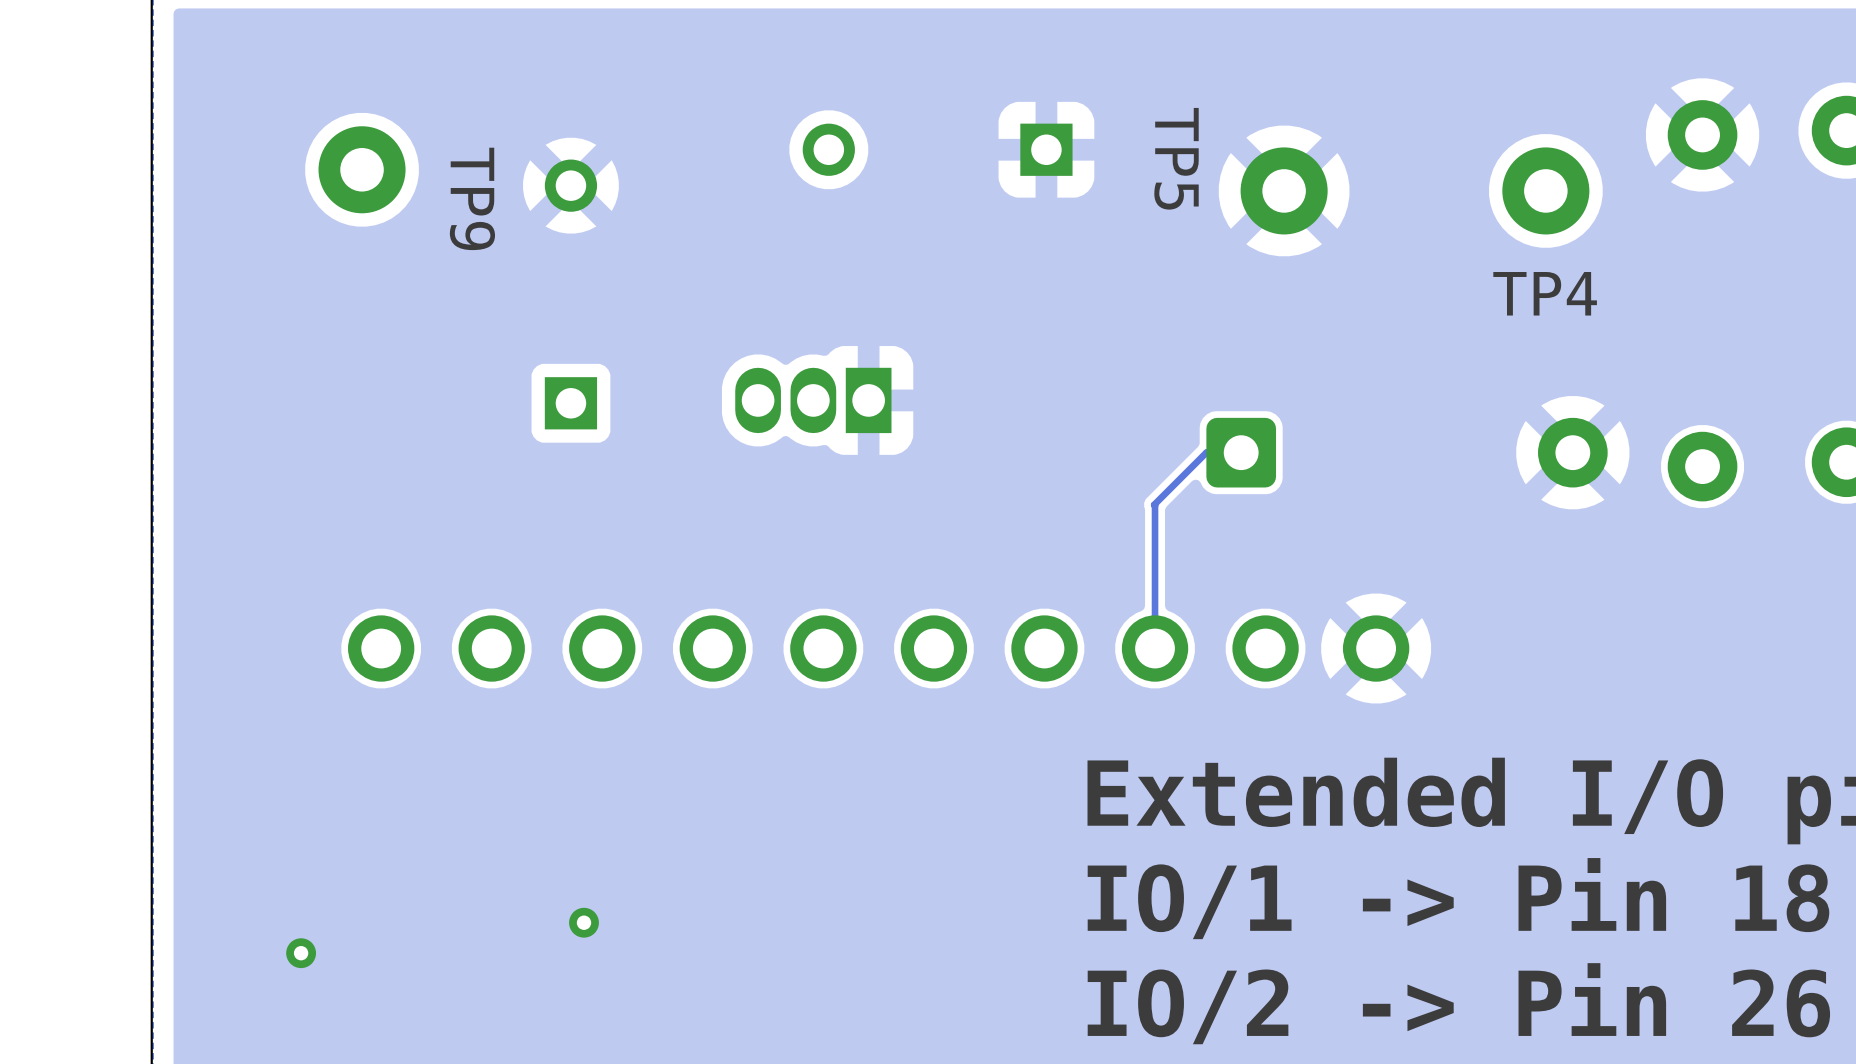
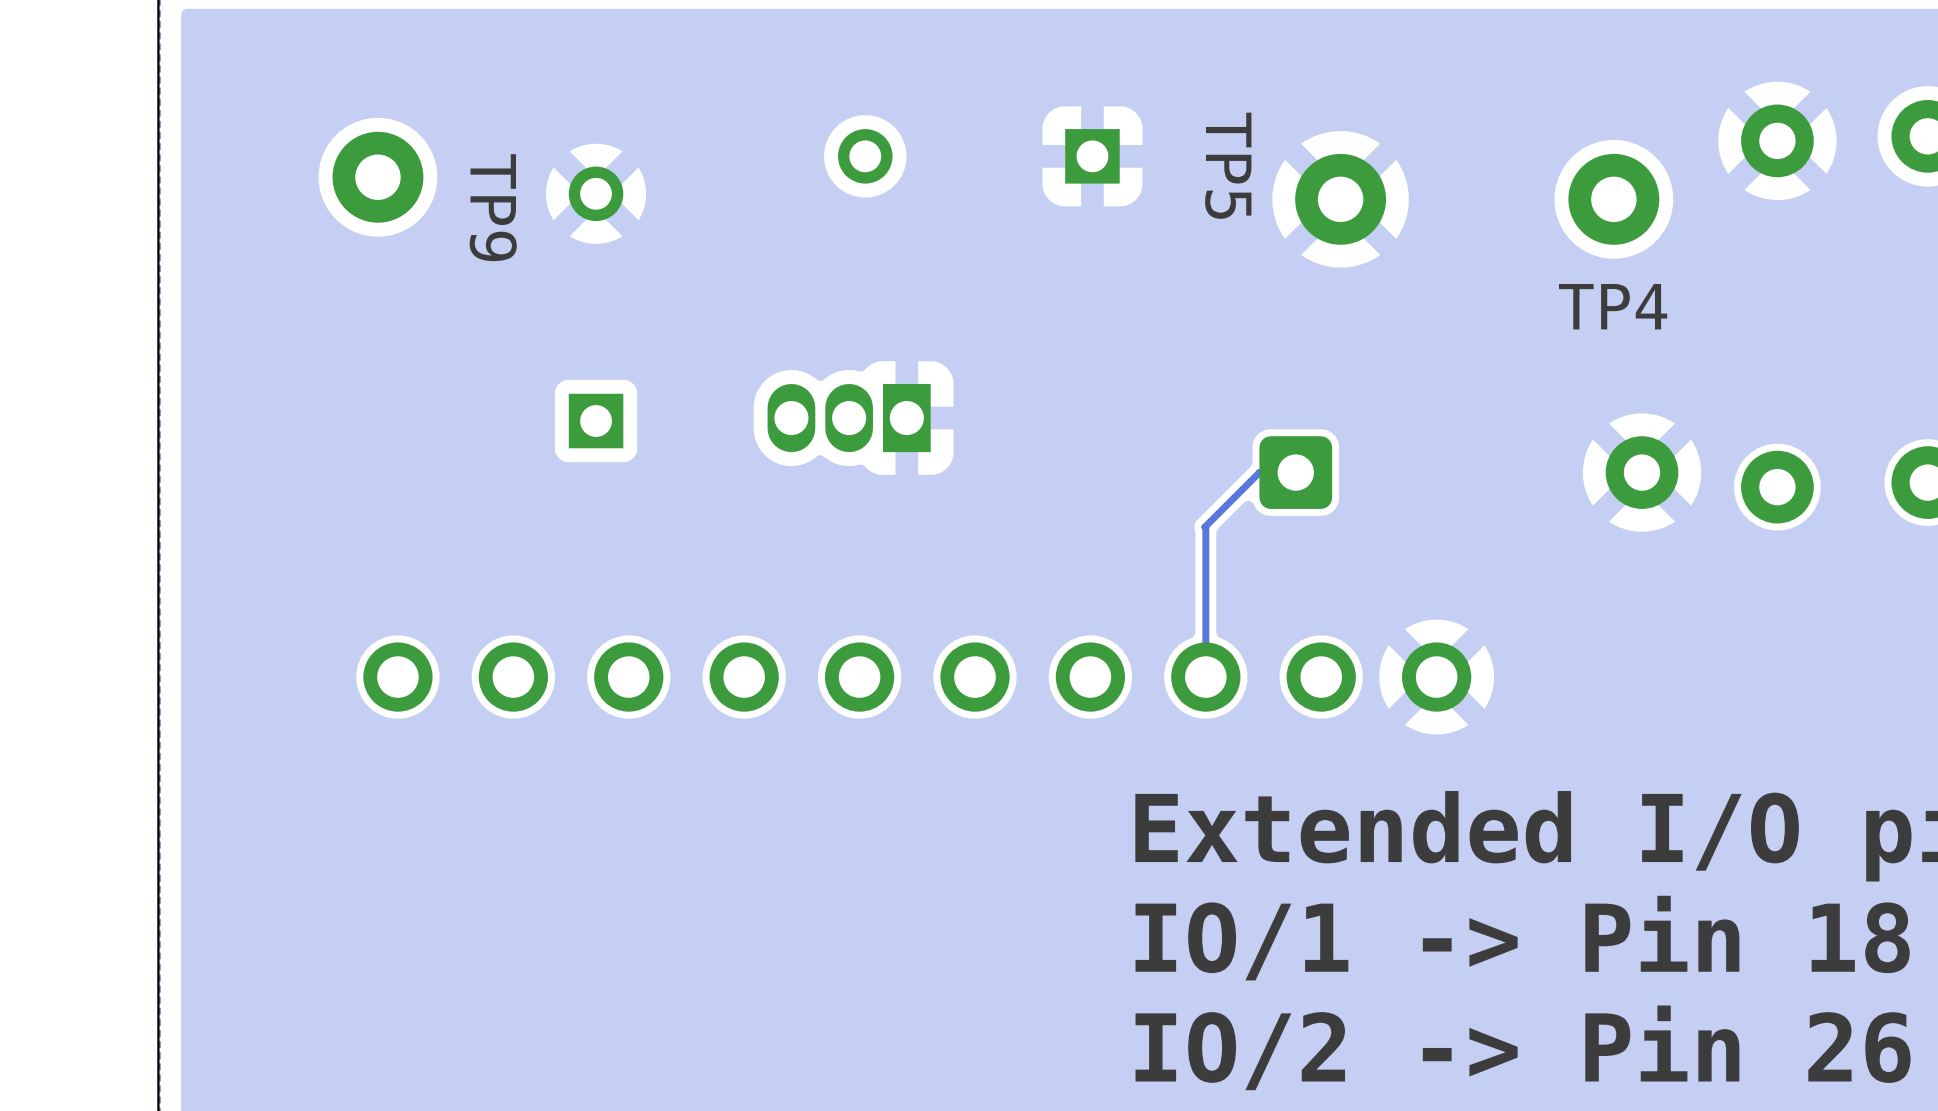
via: (584, 922) -> none
via: (301, 953) -> none

